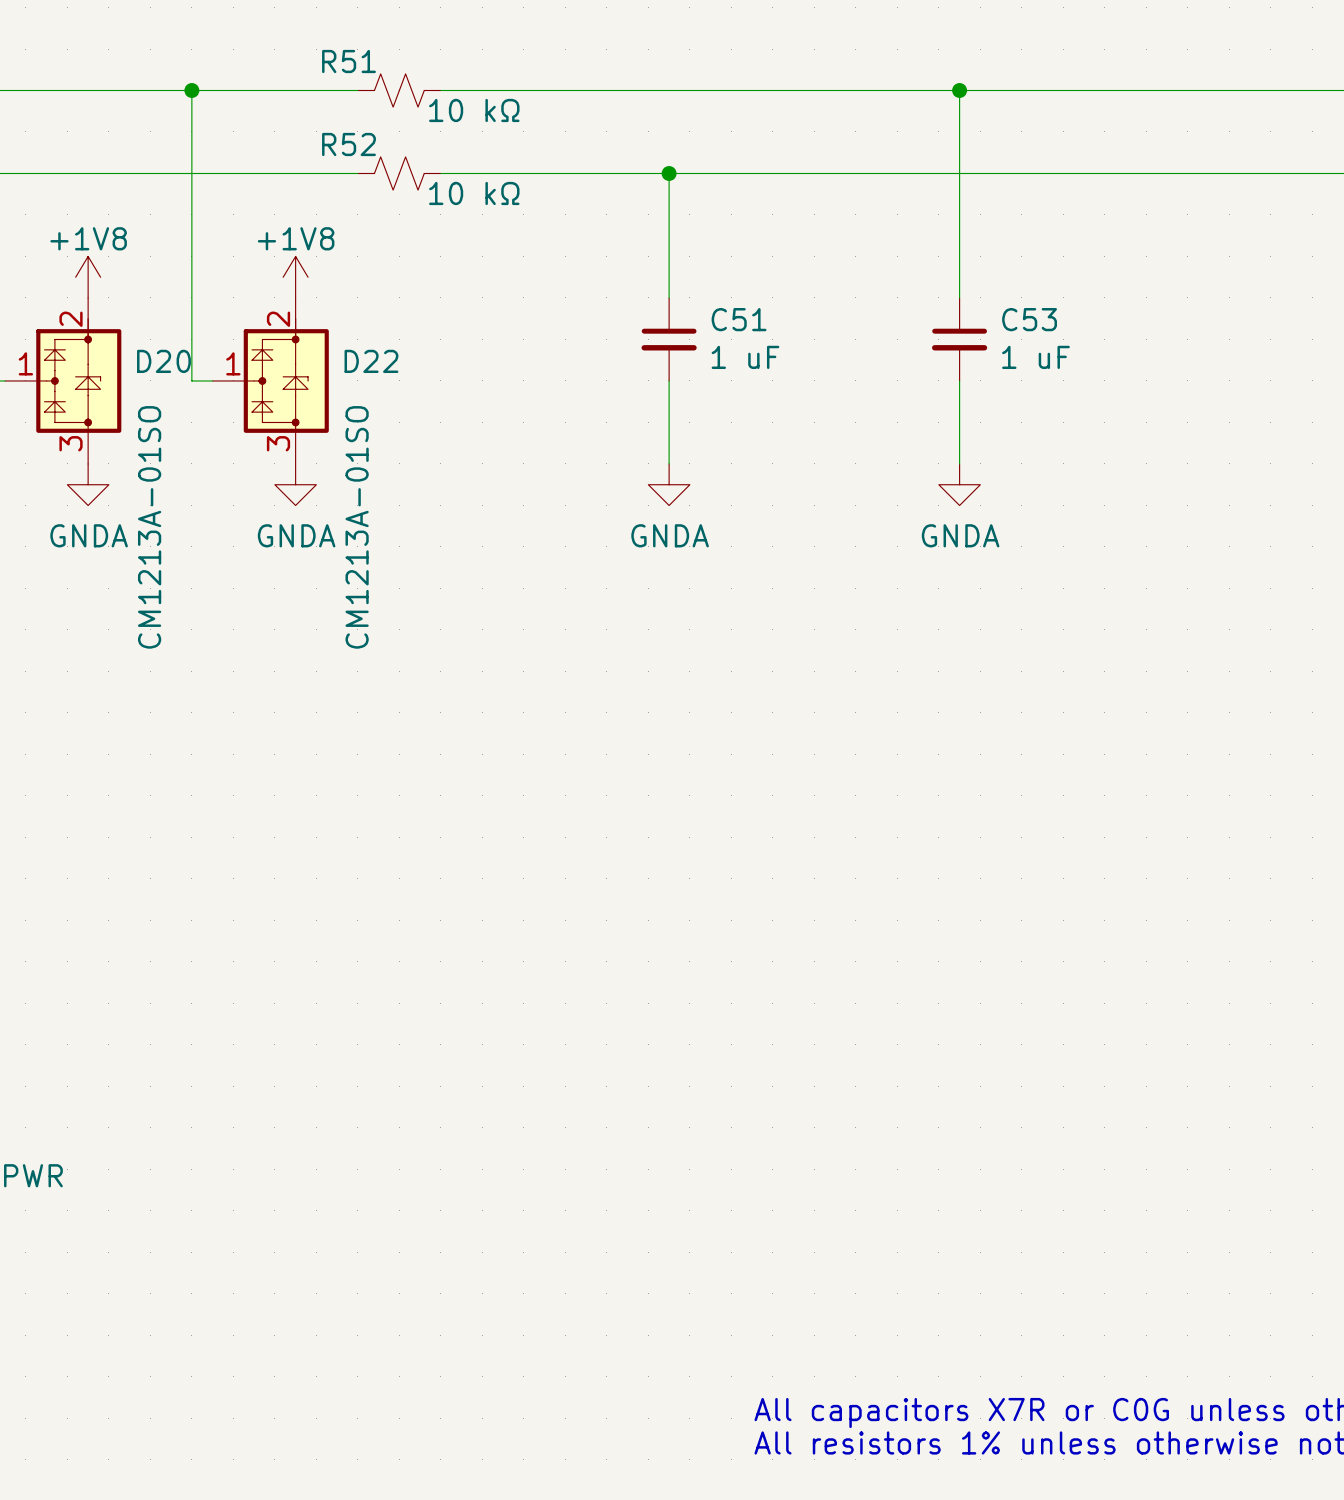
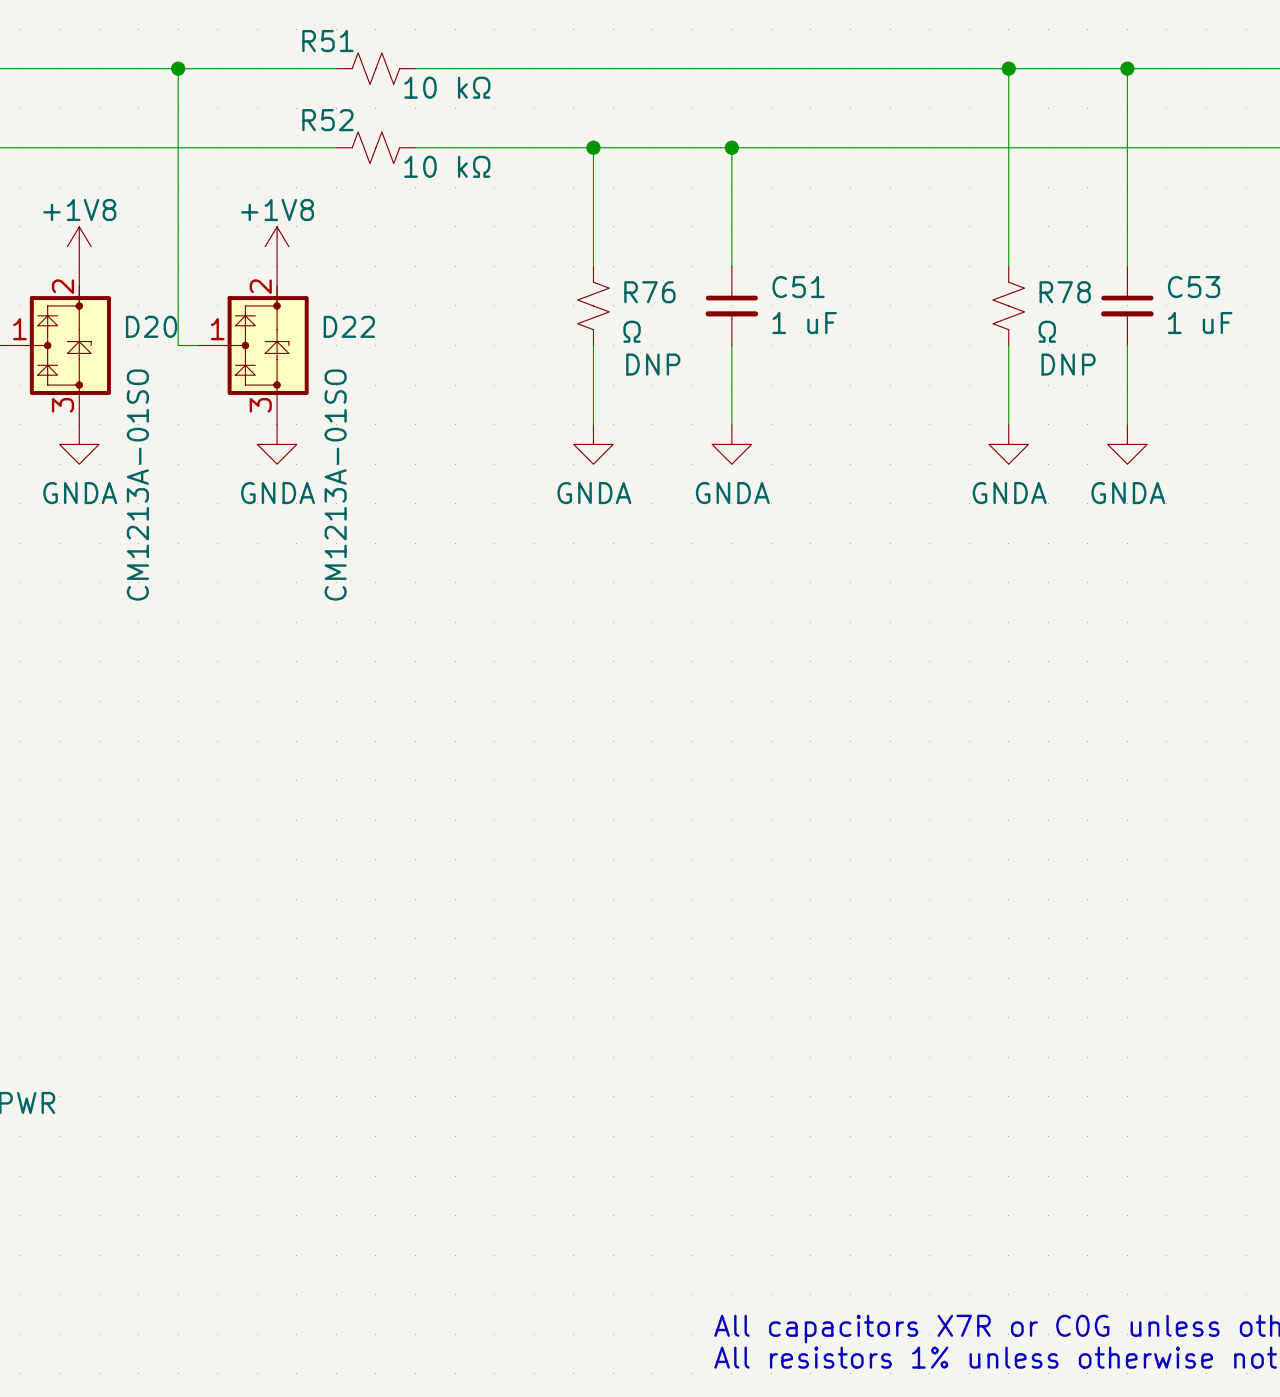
wire: (959, 90) (959, 297) -> (1008, 68) (1008, 266)
junction: (959, 90) -> none
junction: none -> (1008, 68)
wire: none -> (1127, 68) (1127, 266)
junction: none -> (1127, 68)
wire: none -> (593, 147) (593, 266)
wire: (669, 173) (669, 297) -> (731, 147) (731, 266)
junction position: (669, 173) -> (593, 147)
junction: none -> (731, 147)
R76: none -> Ω (593, 305)
C51 position: (669, 339) -> (731, 305)
C53 position: (959, 339) -> (1127, 305)
R78: none -> Ω (1008, 305)
wire: none -> (593, 345) (593, 424)
wire: (669, 380) (669, 463) -> (731, 345) (731, 424)
wire: (959, 380) (959, 463) -> (1008, 345) (1008, 424)
wire: none -> (1127, 345) (1127, 424)
power symbol position: GNDA (669, 484) -> GNDA (593, 444)
power symbol: none -> GNDA (731, 444)
power symbol: GNDA (959, 484) -> none
power symbol: none -> GNDA (1008, 444)
power symbol: none -> GNDA (1127, 444)

